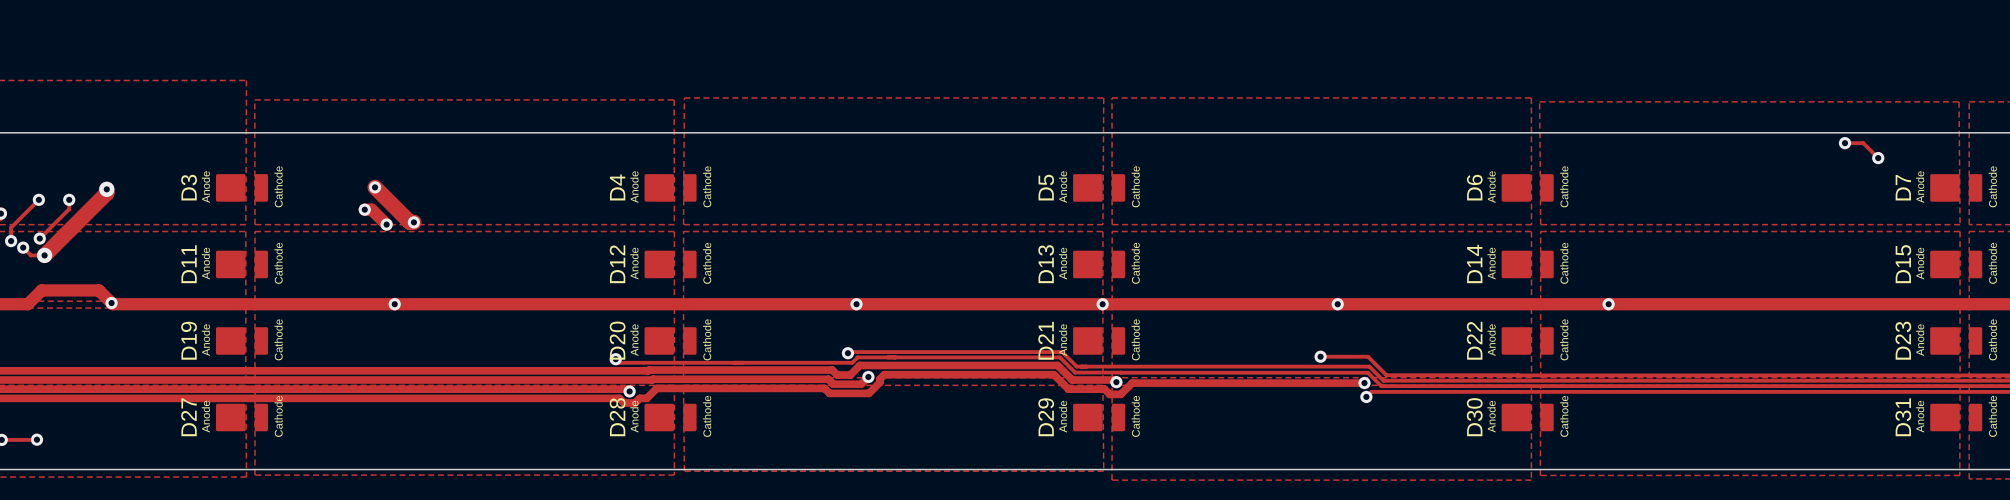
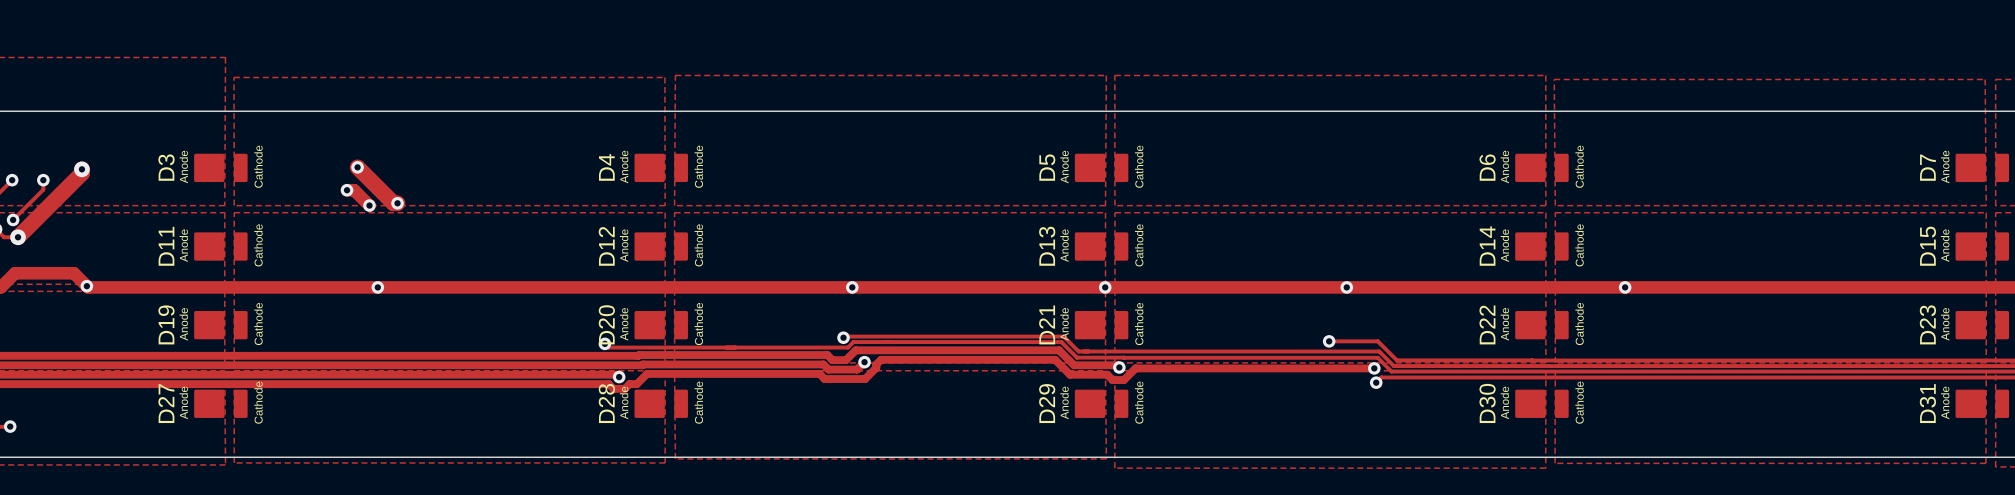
track: (1845, 143) (1863, 143) (1878, 158) -> none
via: (1845, 143) -> none
via: (1878, 158) -> none

